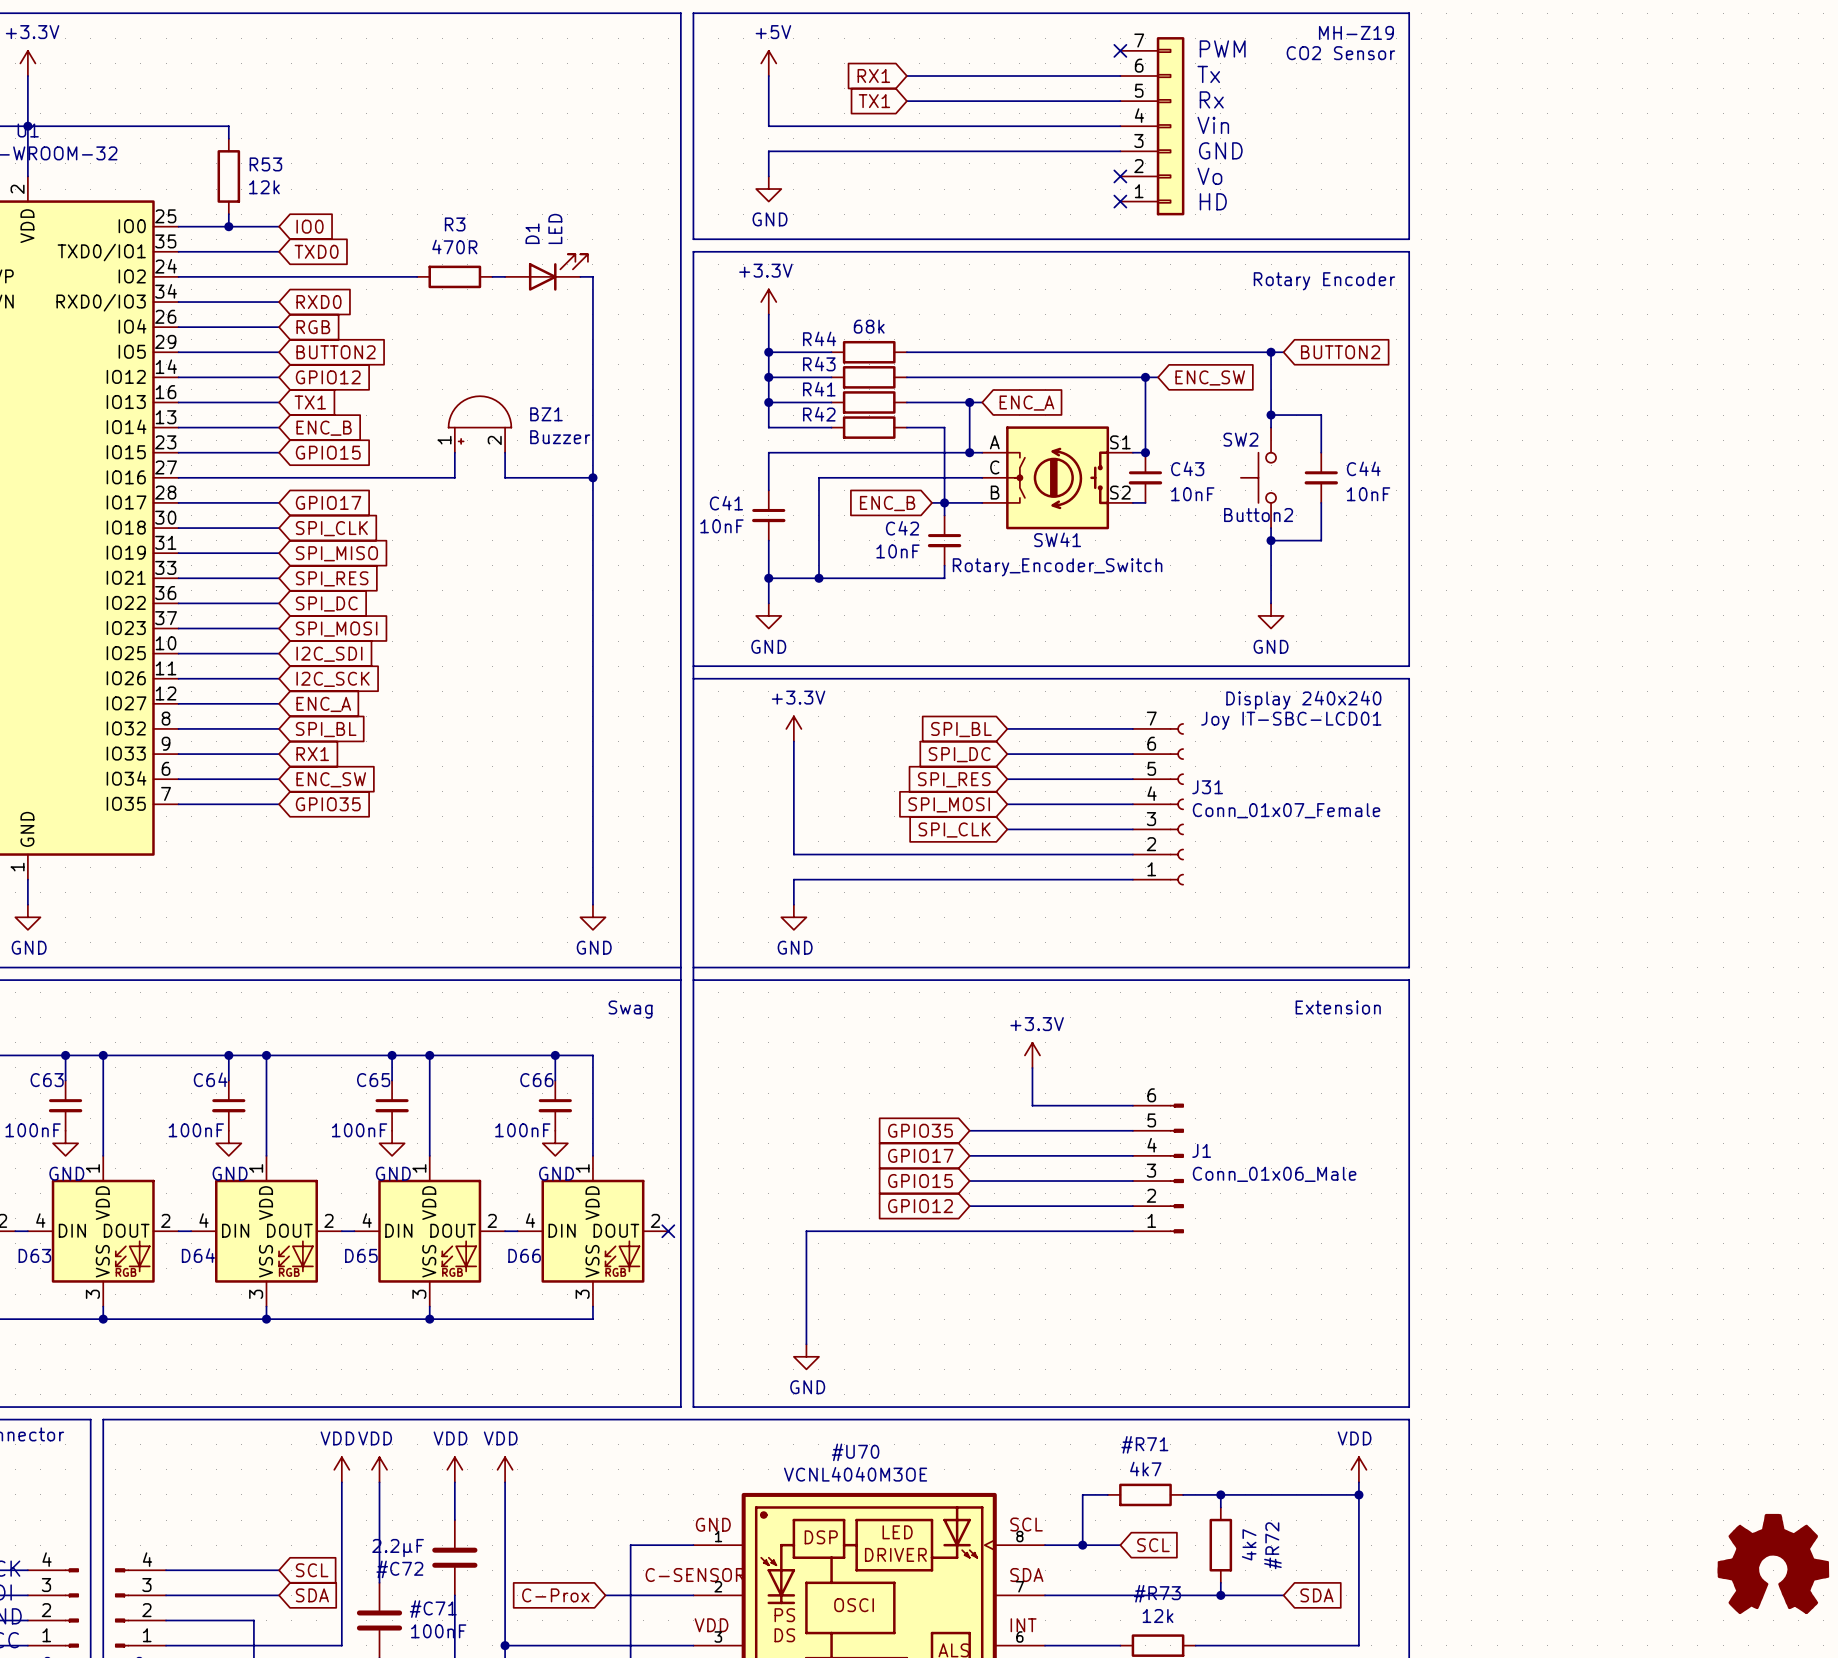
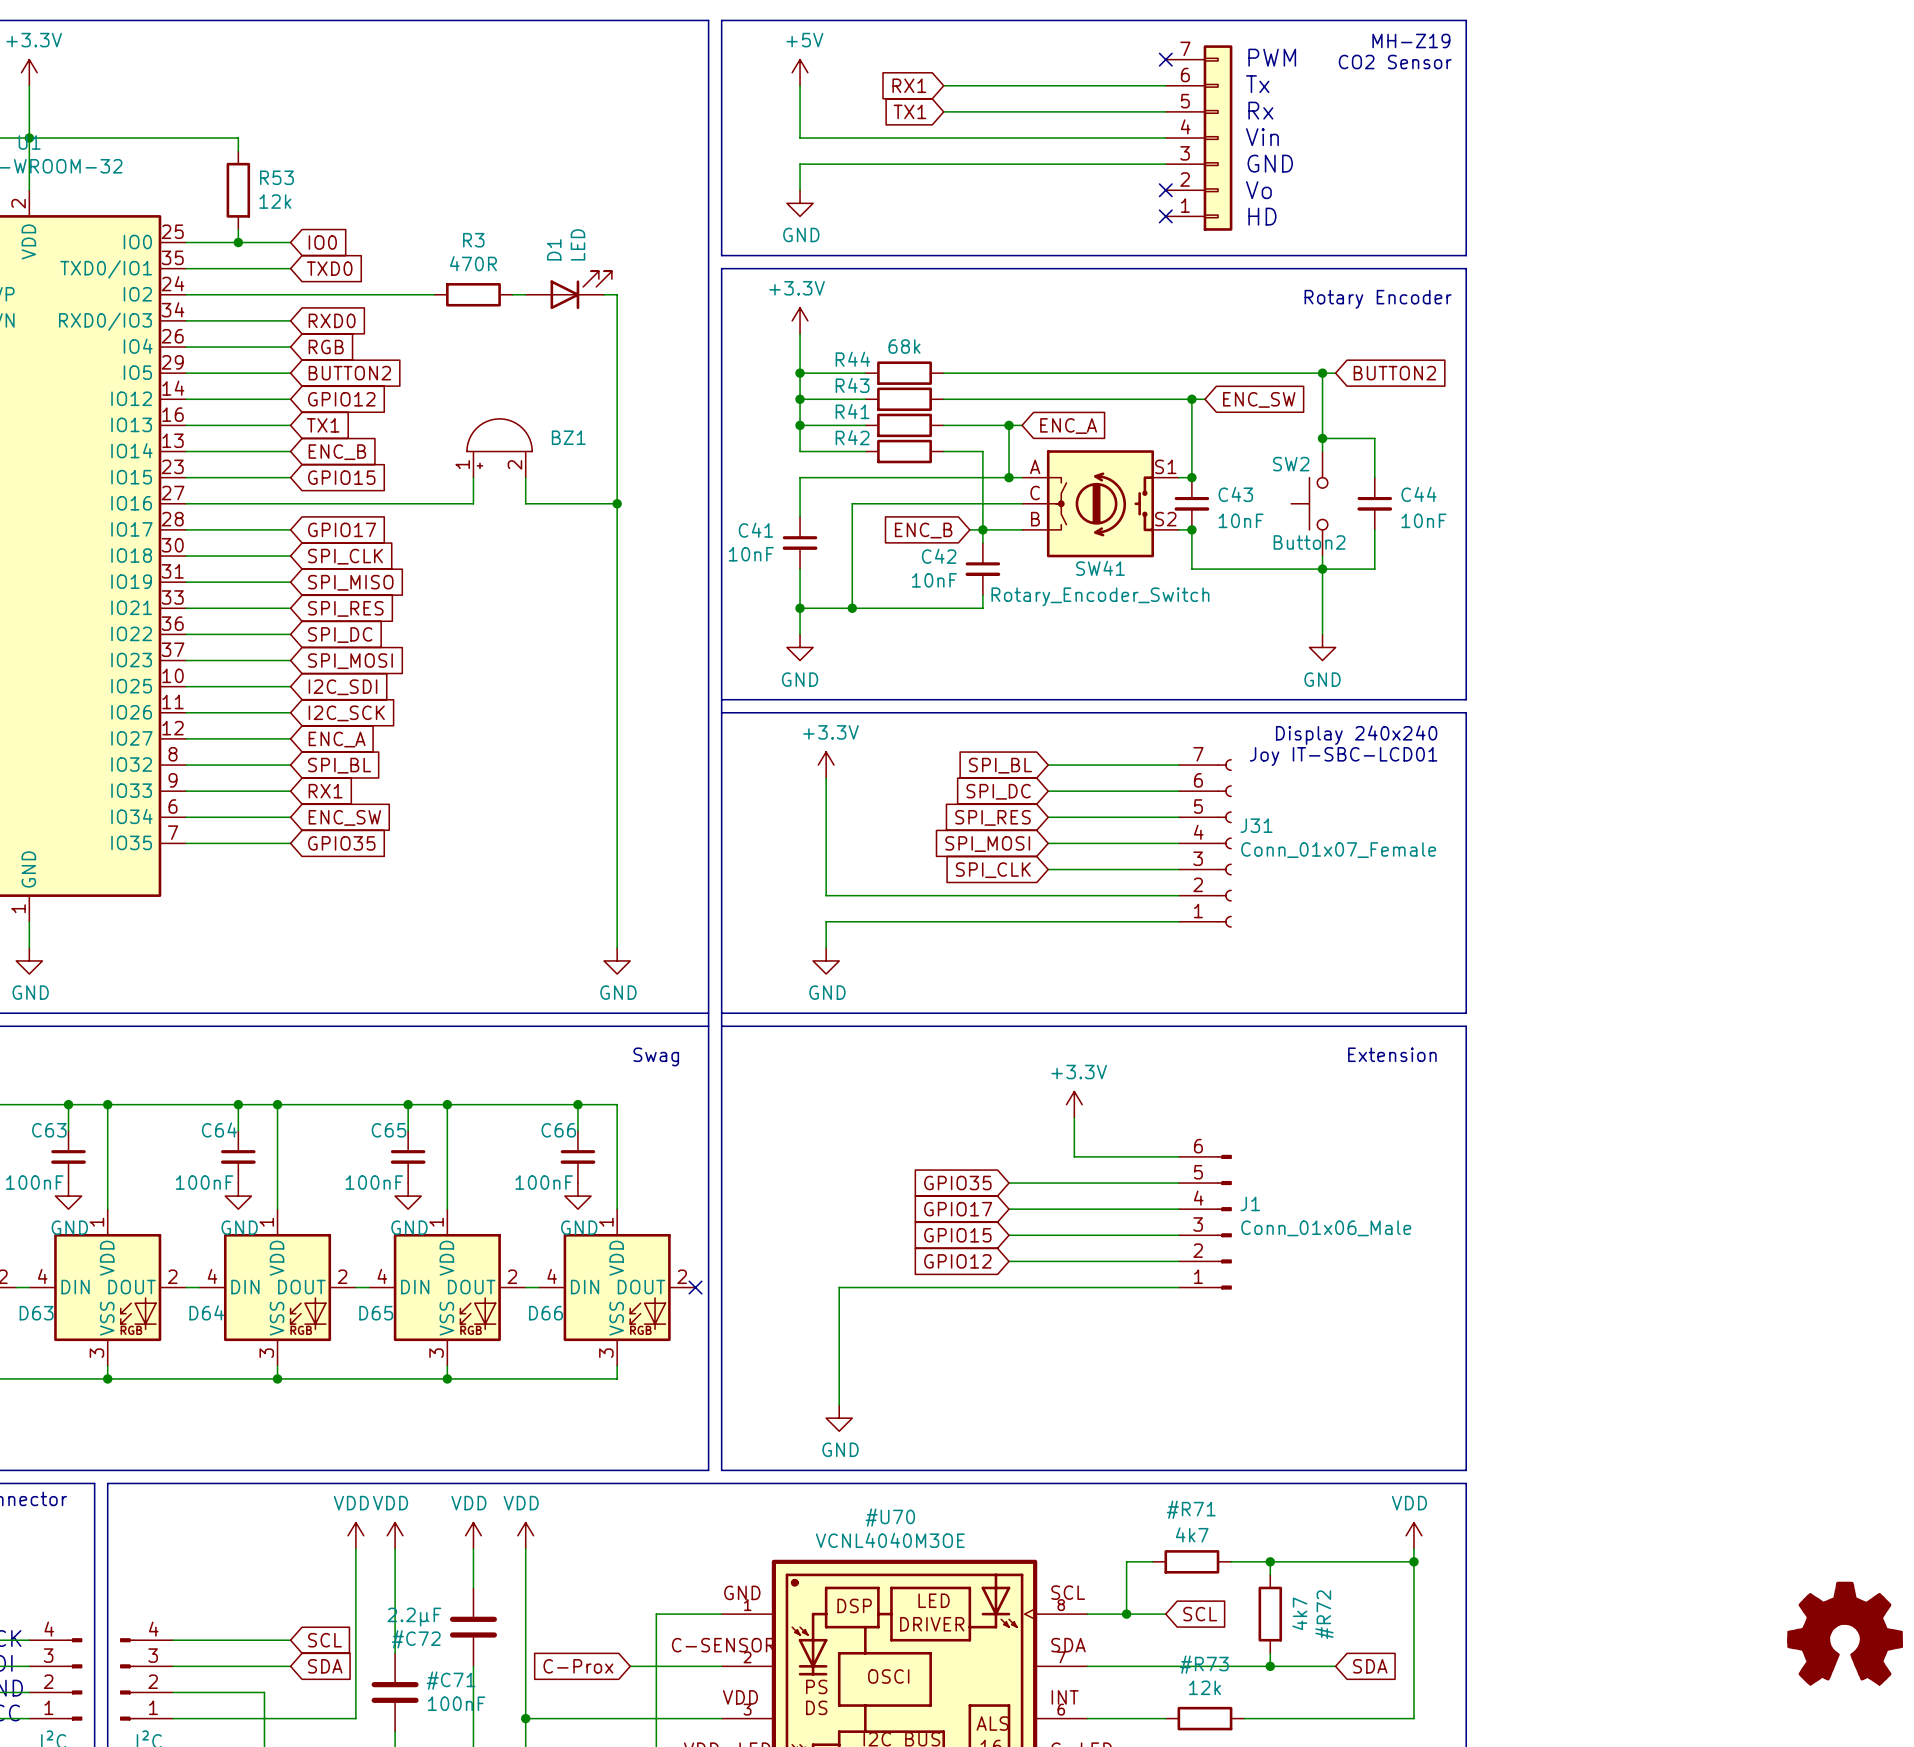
BZ1 value: Buzzer (560, 437) -> none
wire: none -> (1191, 529) (1191, 569) (1322, 569)
junction: none -> (1191, 529)

